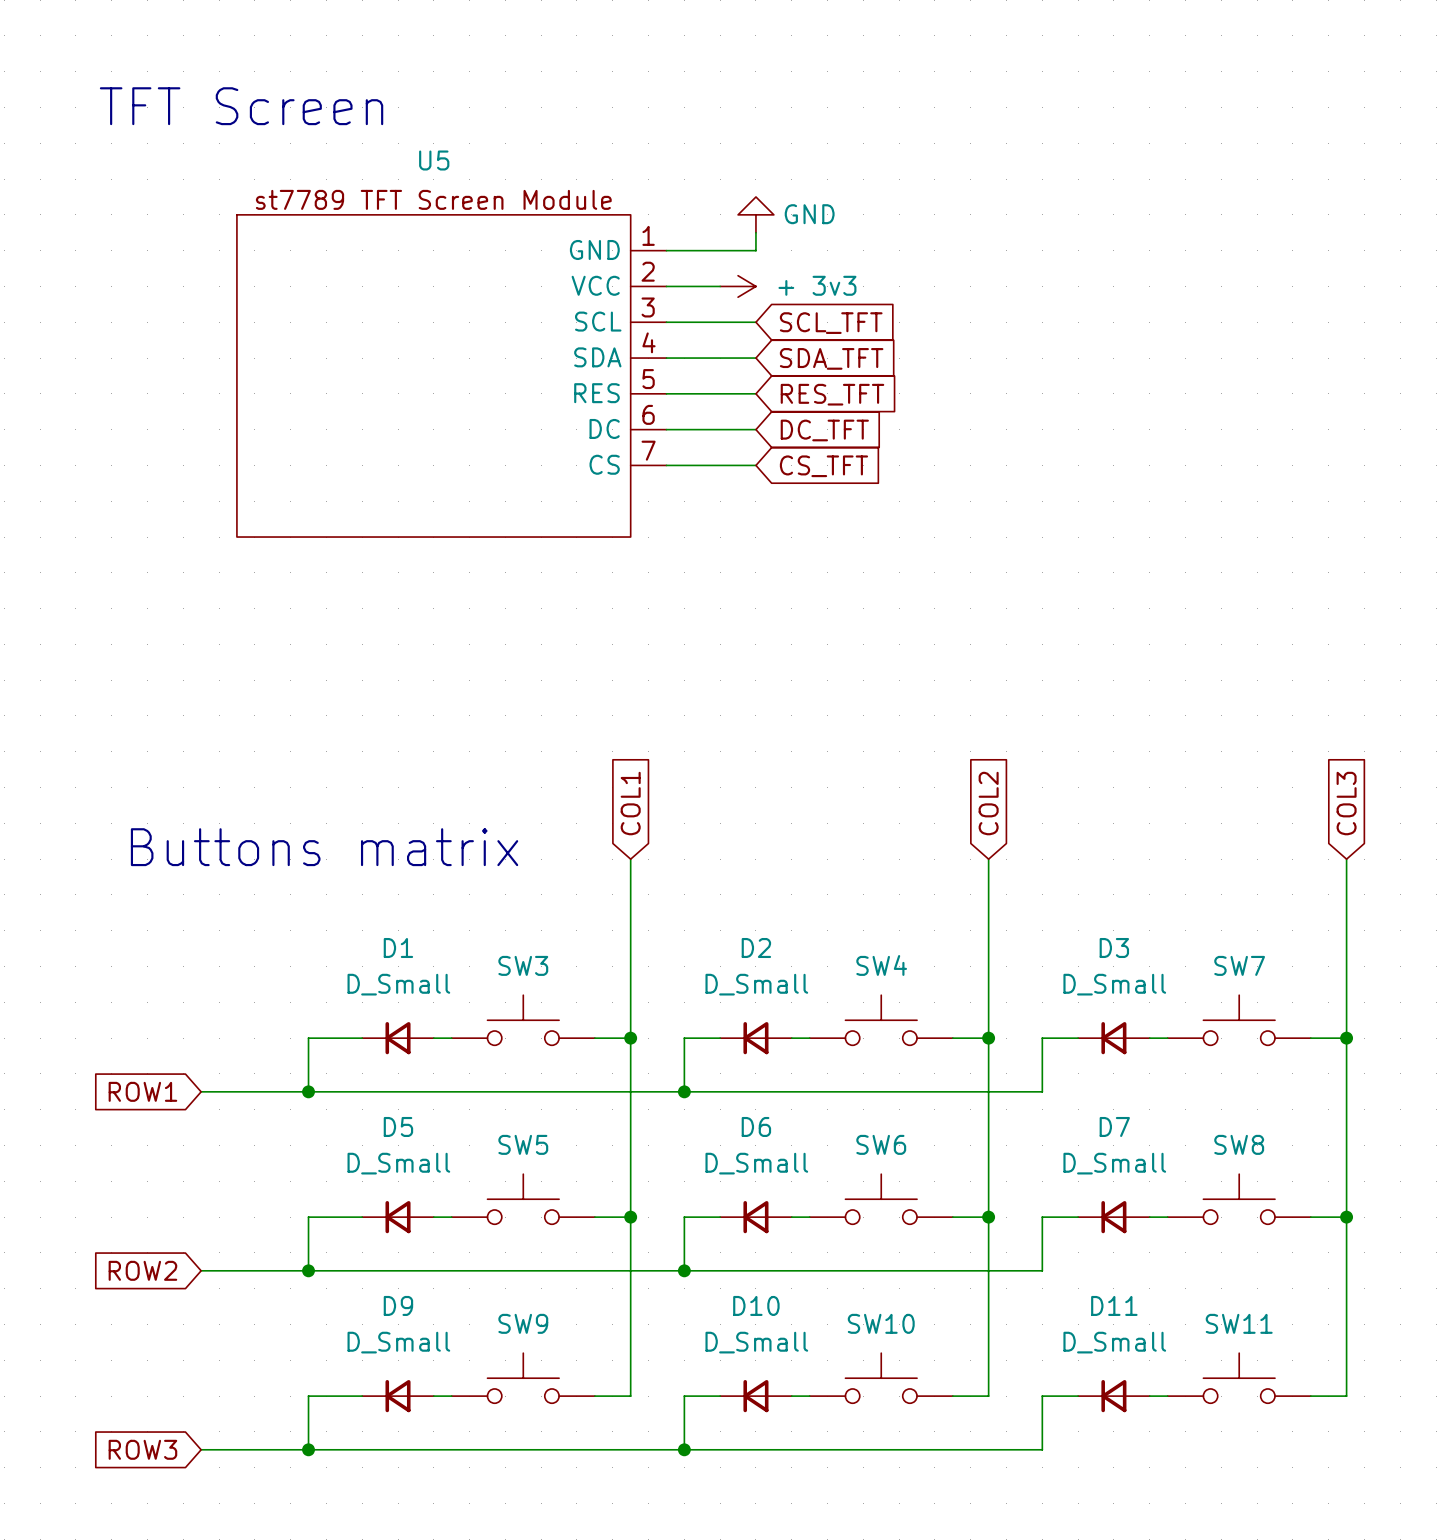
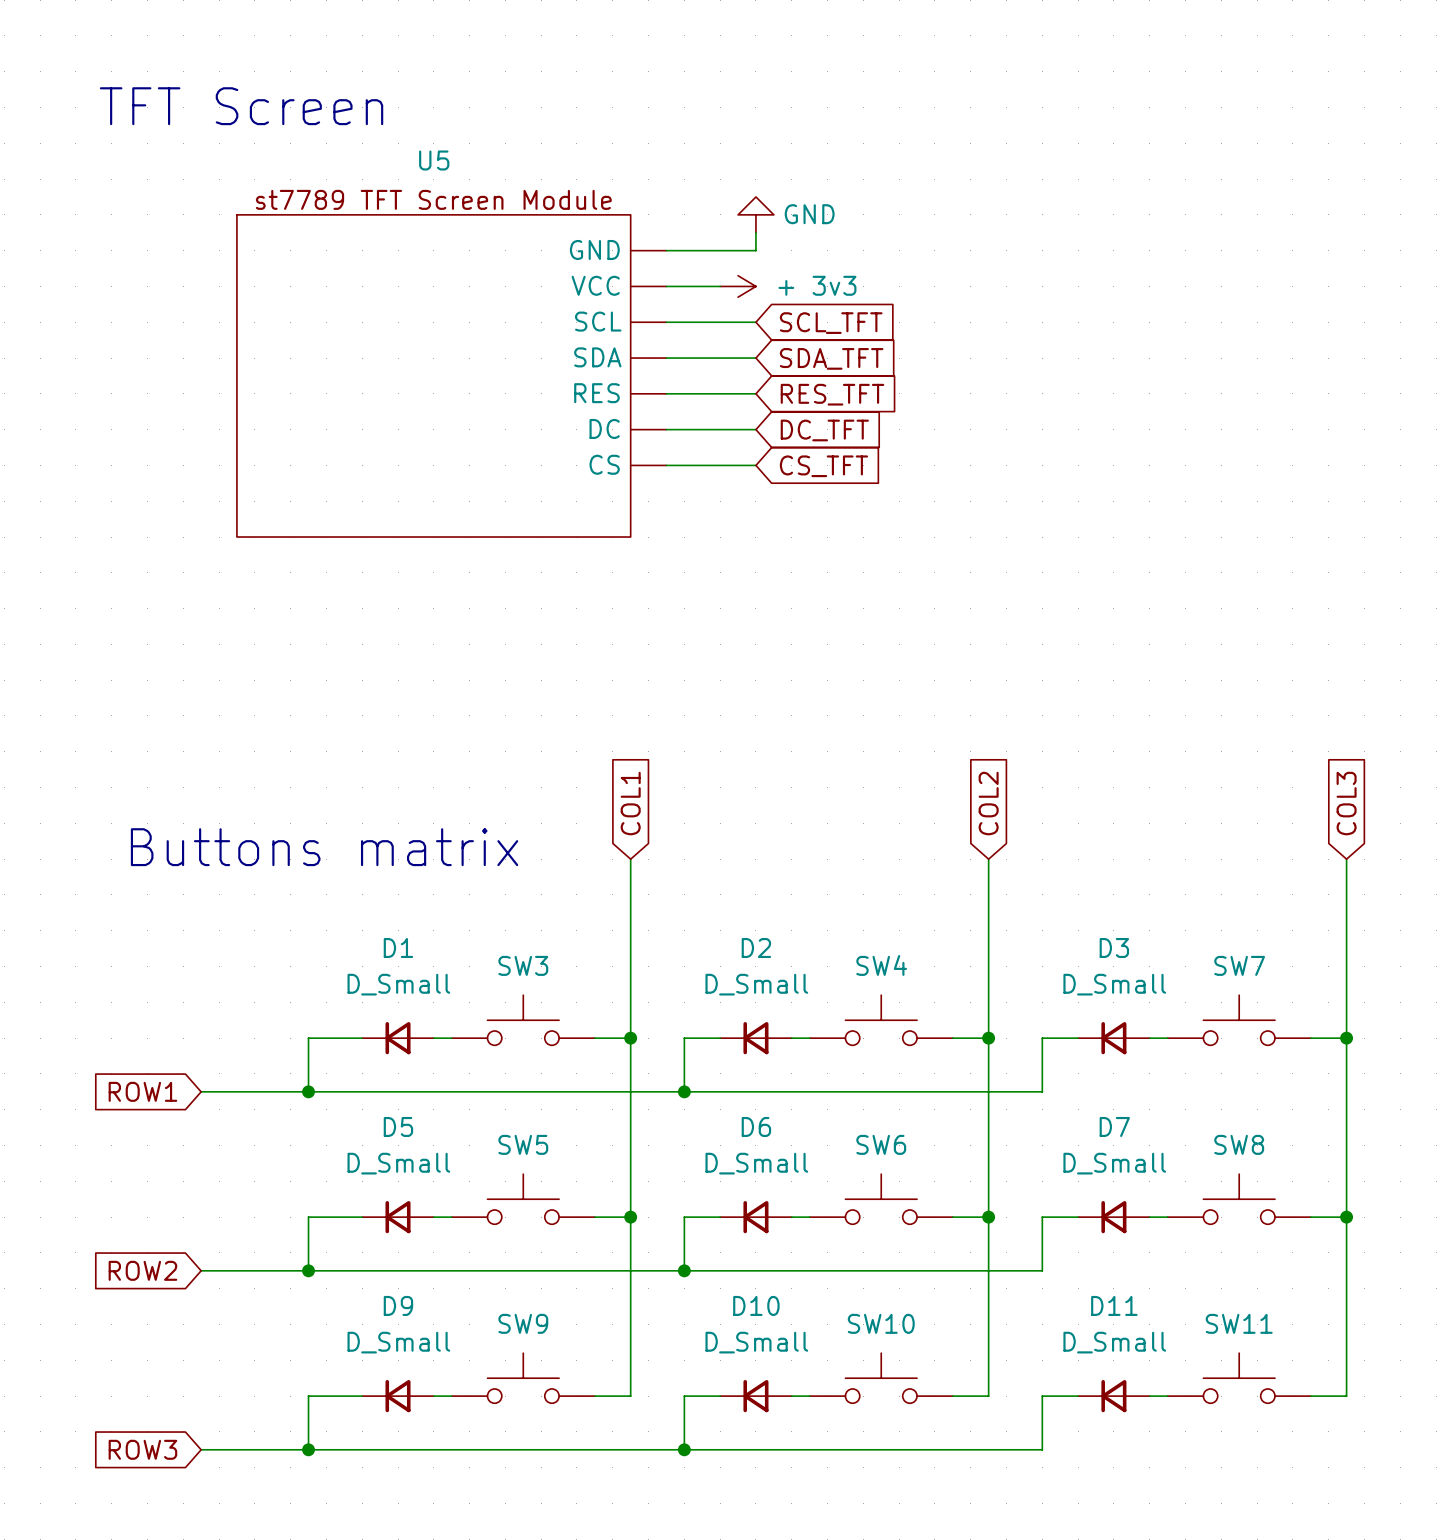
U5 pin number: 1 (648, 235) -> none
U5 pin number: 2 (648, 271) -> none
U5 pin number: 3 (648, 307) -> none
U5 pin number: 4 (649, 342) -> none
U5 pin number: 5 (648, 379) -> none
U5 pin number: 6 (648, 414) -> none
U5 pin number: 7 (648, 450) -> none

